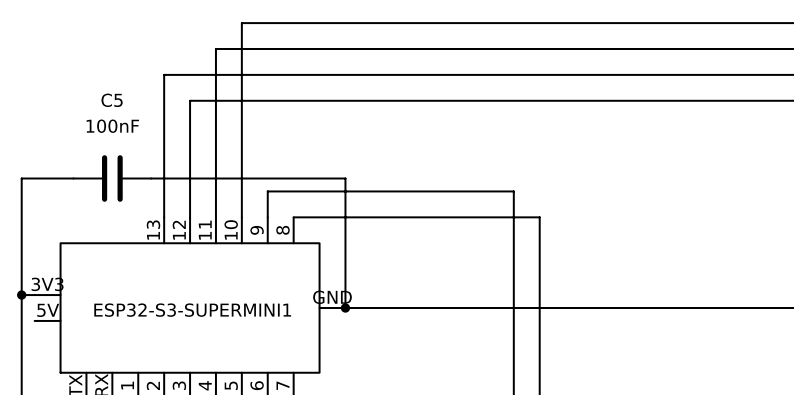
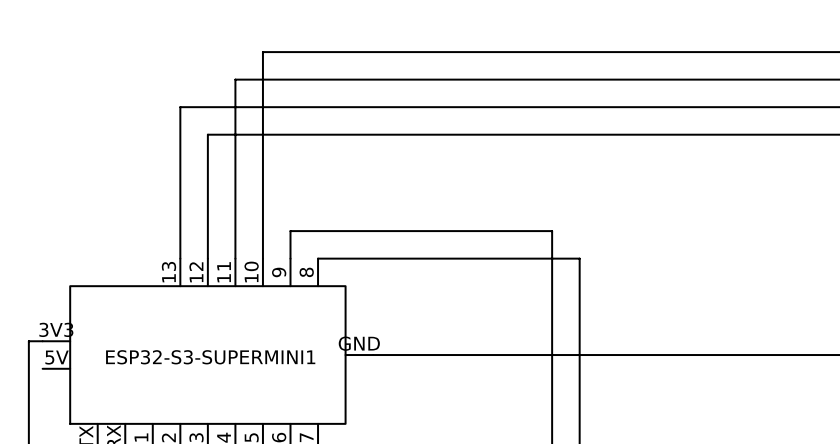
wire: (73, 178) (21, 178) (21, 295) -> none
C5: 100nF (112, 178) -> none
wire: (151, 178) (345, 178) (345, 308) -> none
junction: (21, 295) -> none
junction: (345, 308) -> none

